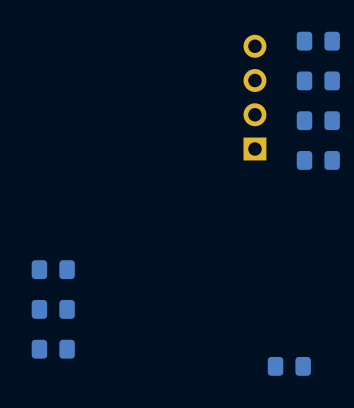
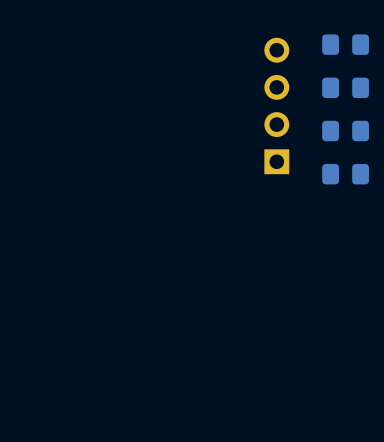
part: (53, 269) -> none
part: (53, 309) -> none
part: (53, 349) -> none
part: (289, 366) -> none

